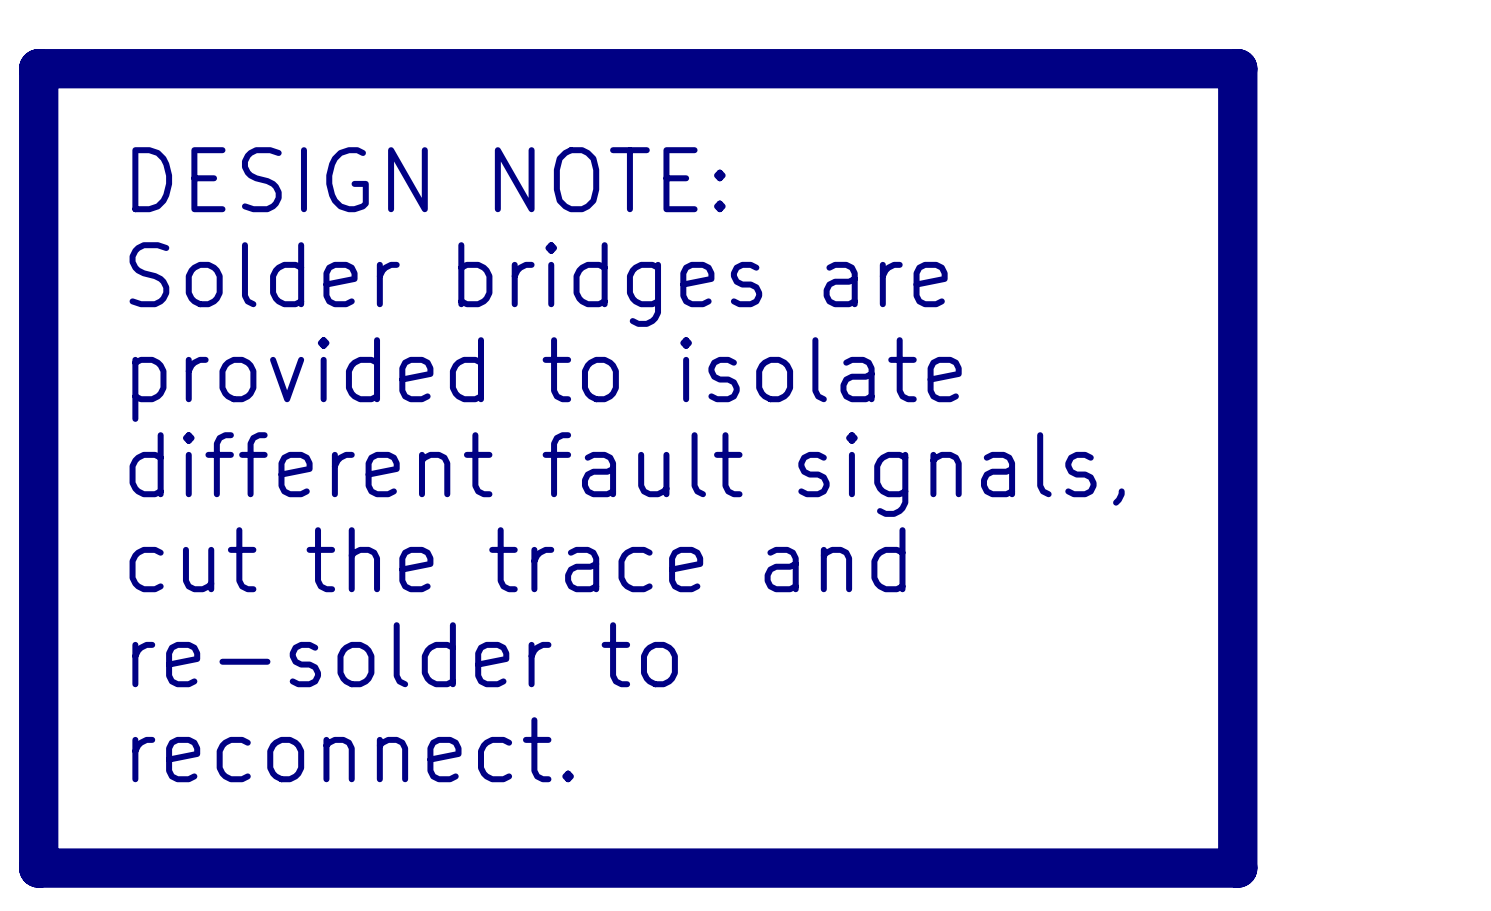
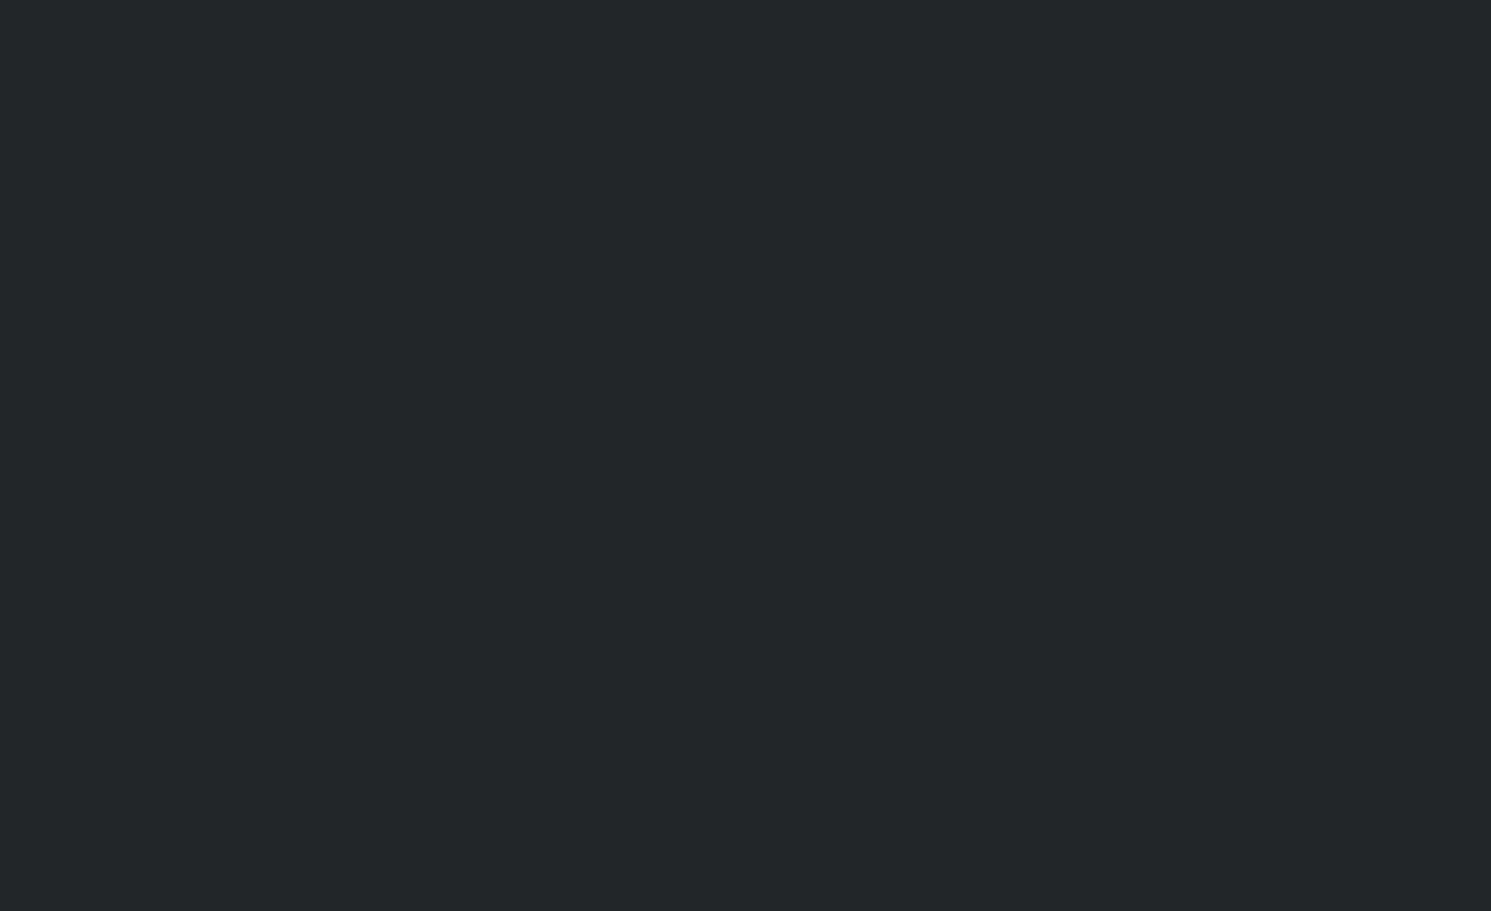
line: (38, 68) (1237, 68) (1237, 868) (38, 868) (38, 68) -> none
text: DESIGN NOTE: (429, 179) -> none
text: Solder bridges are (538, 284) -> none
text: provided to isolate (547, 379) -> none
text: different fault signals, (627, 474) -> none
text: cut the trace and (517, 559) -> none
text: re-solder to (405, 654) -> none
text: reconnect. (353, 749) -> none

